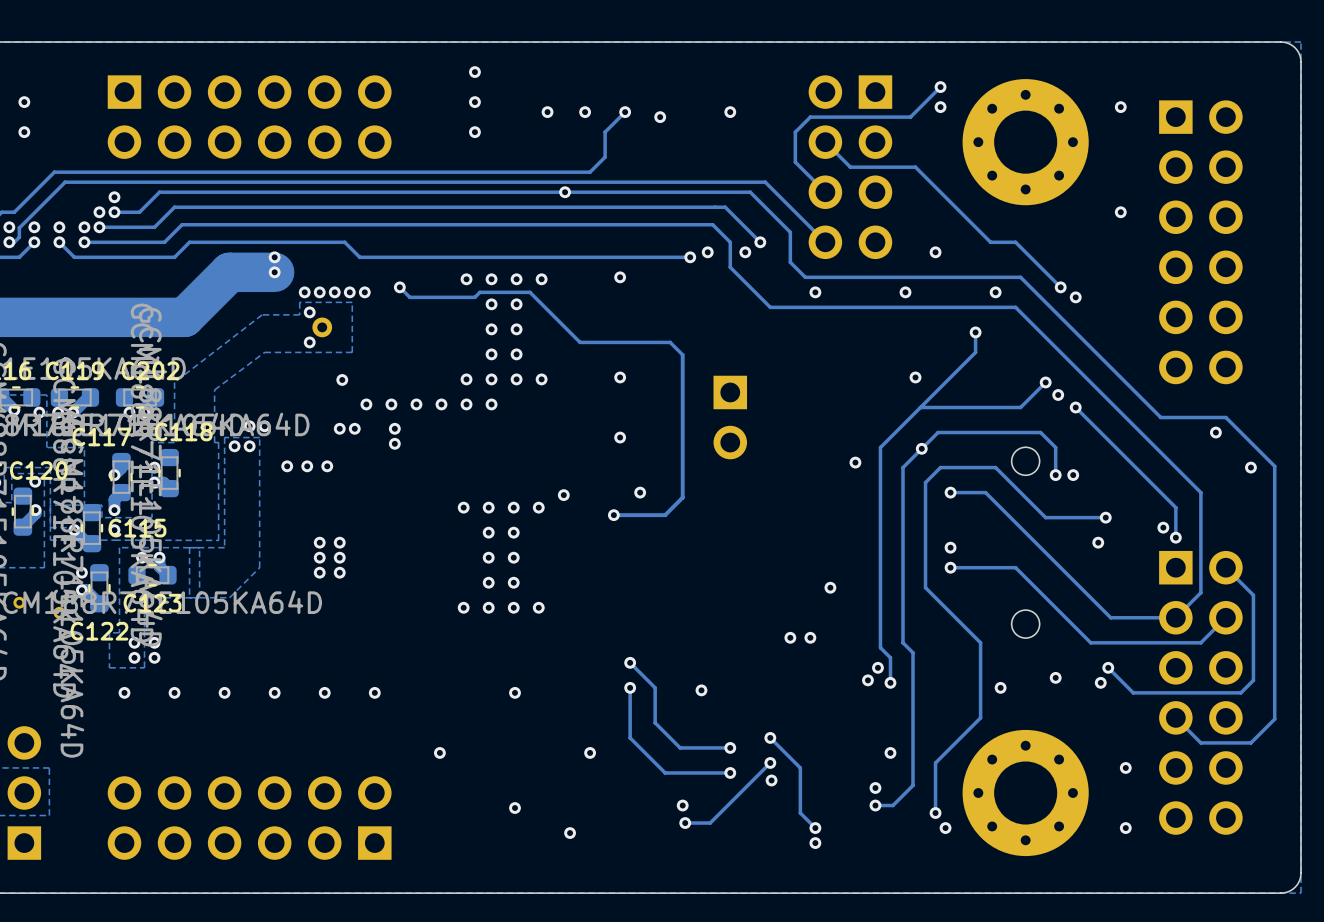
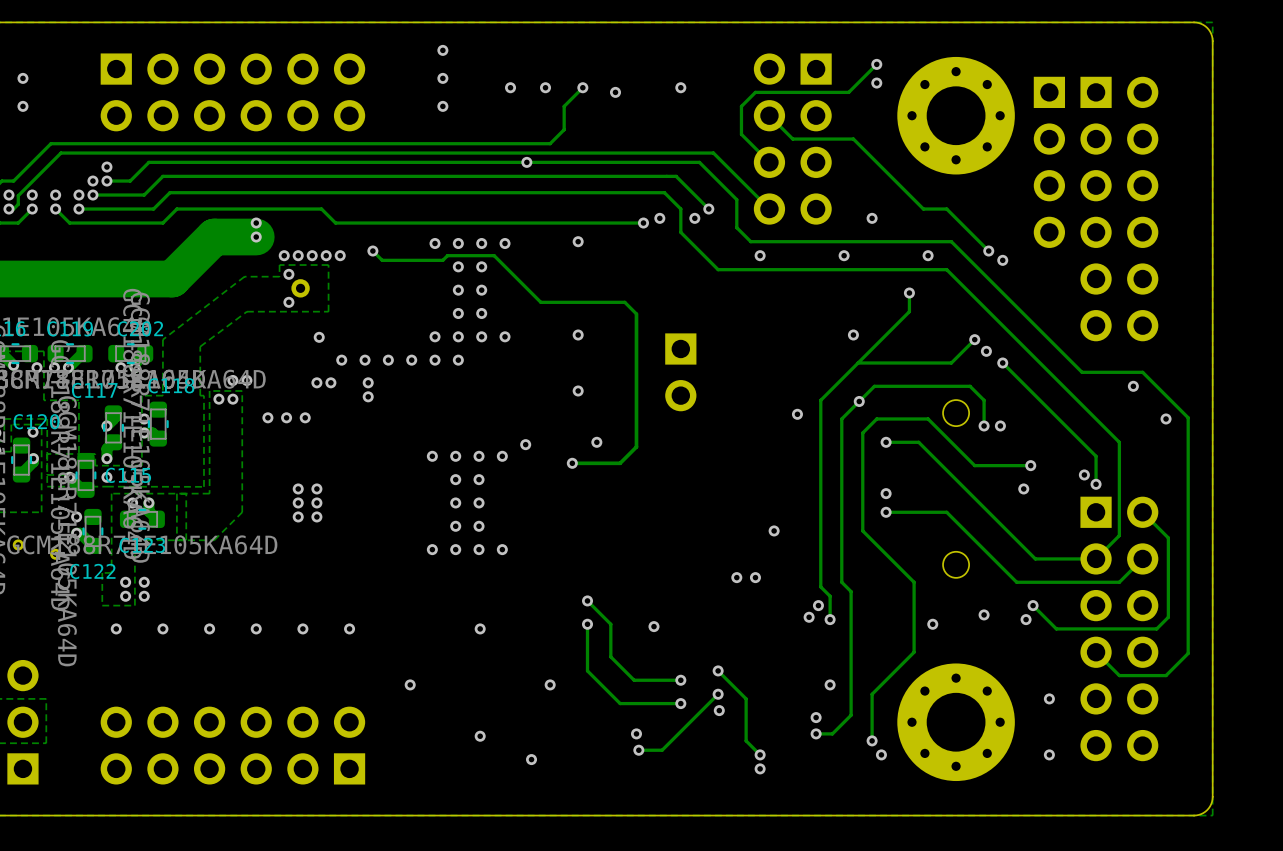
via: (1120, 107) -> none
part: none -> (1049, 162)
via: (1120, 212) -> none

